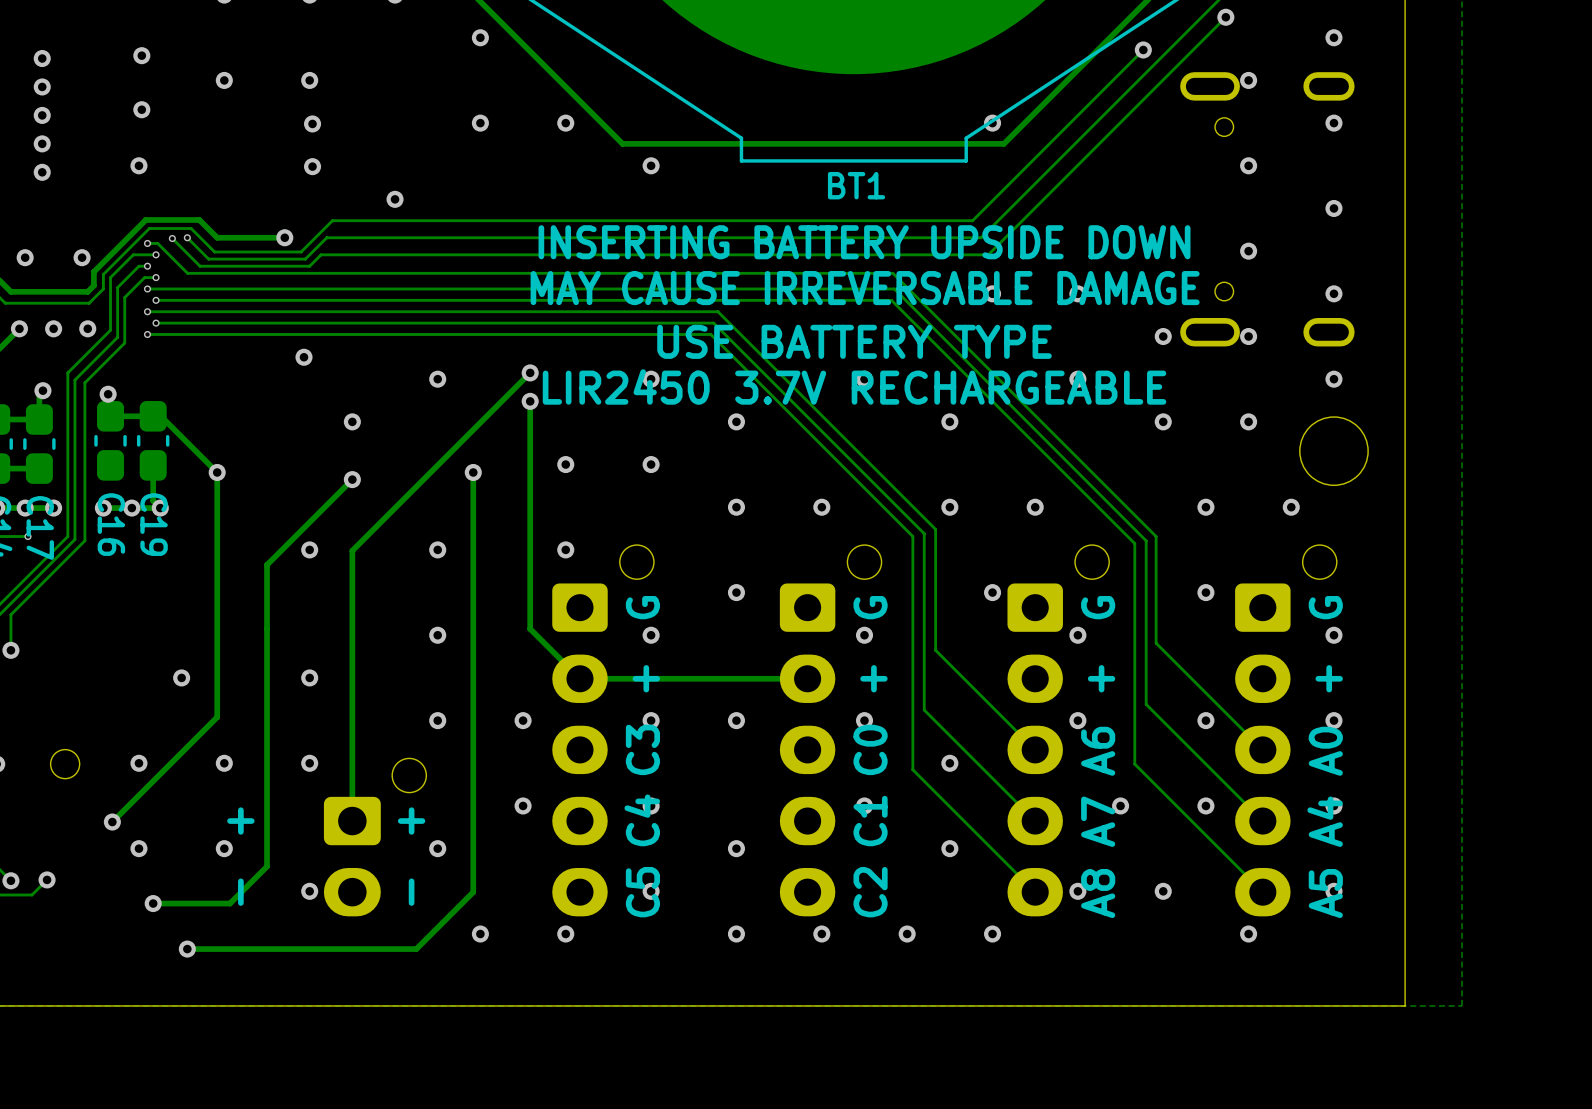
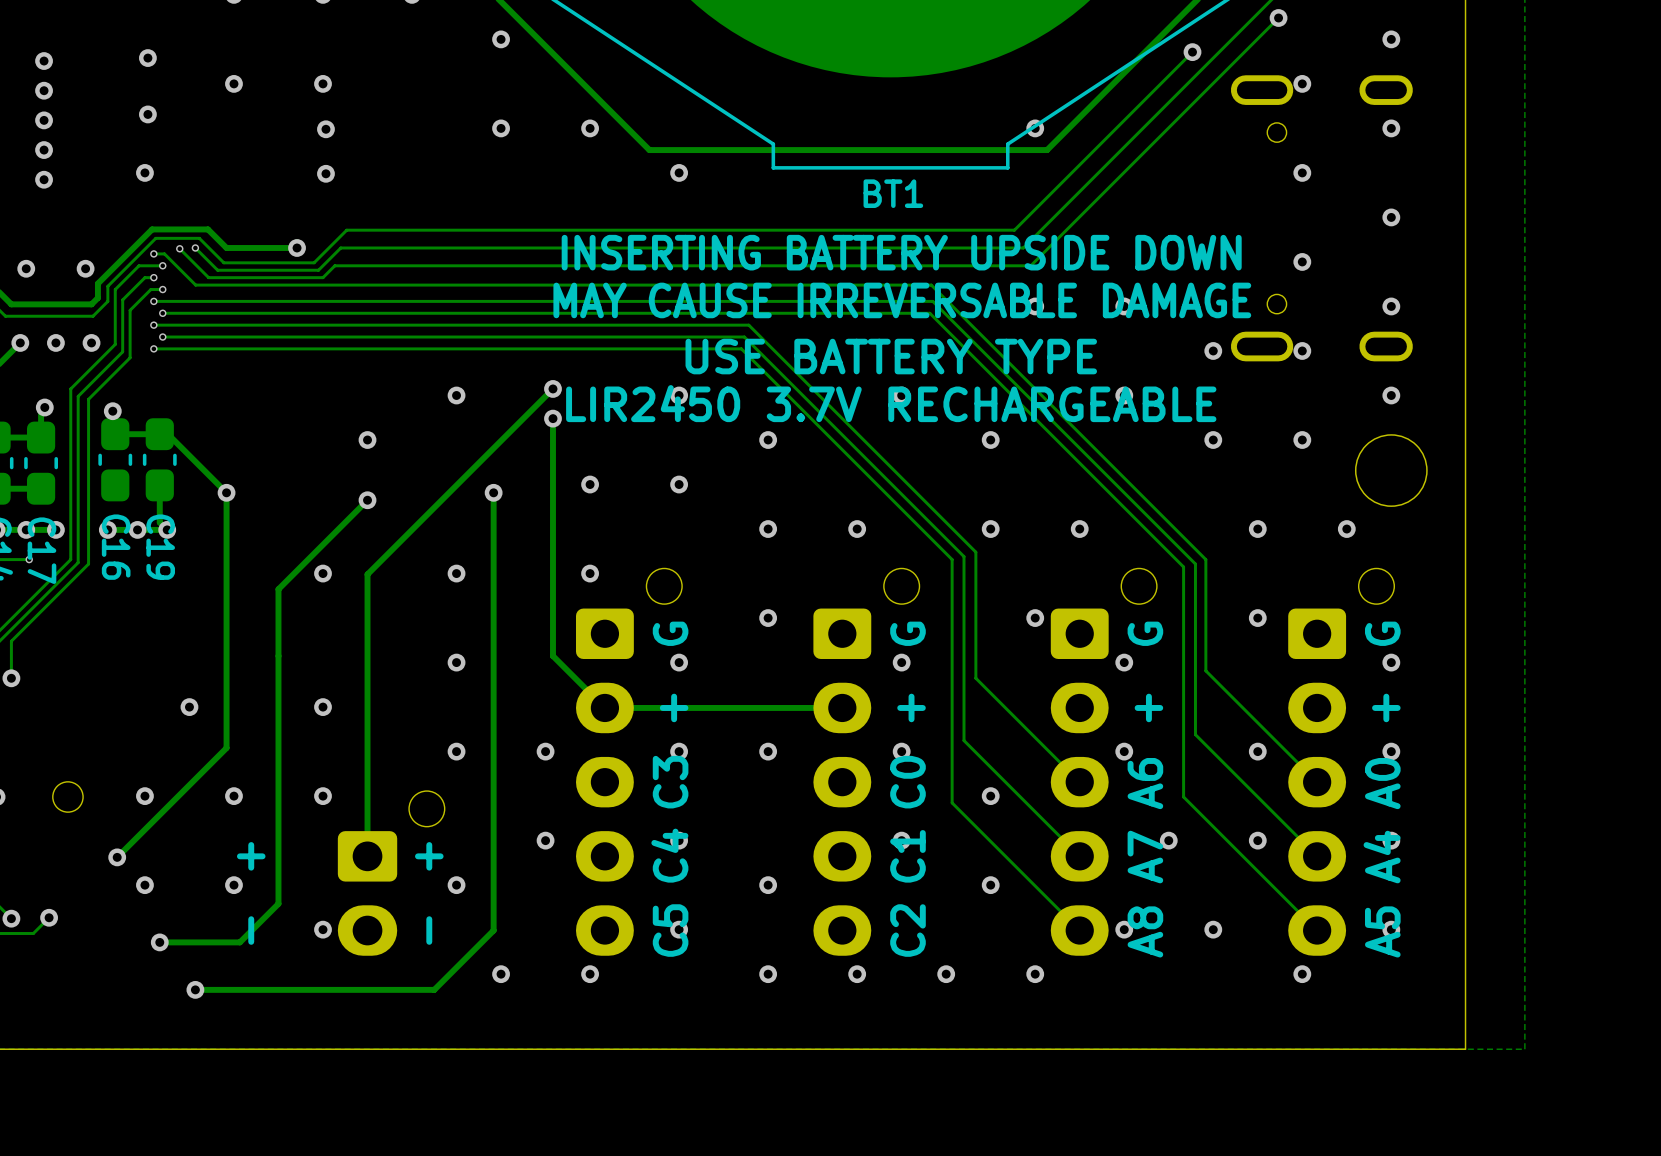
via: (395, 199) -> none
via: (303, 357) -> none

